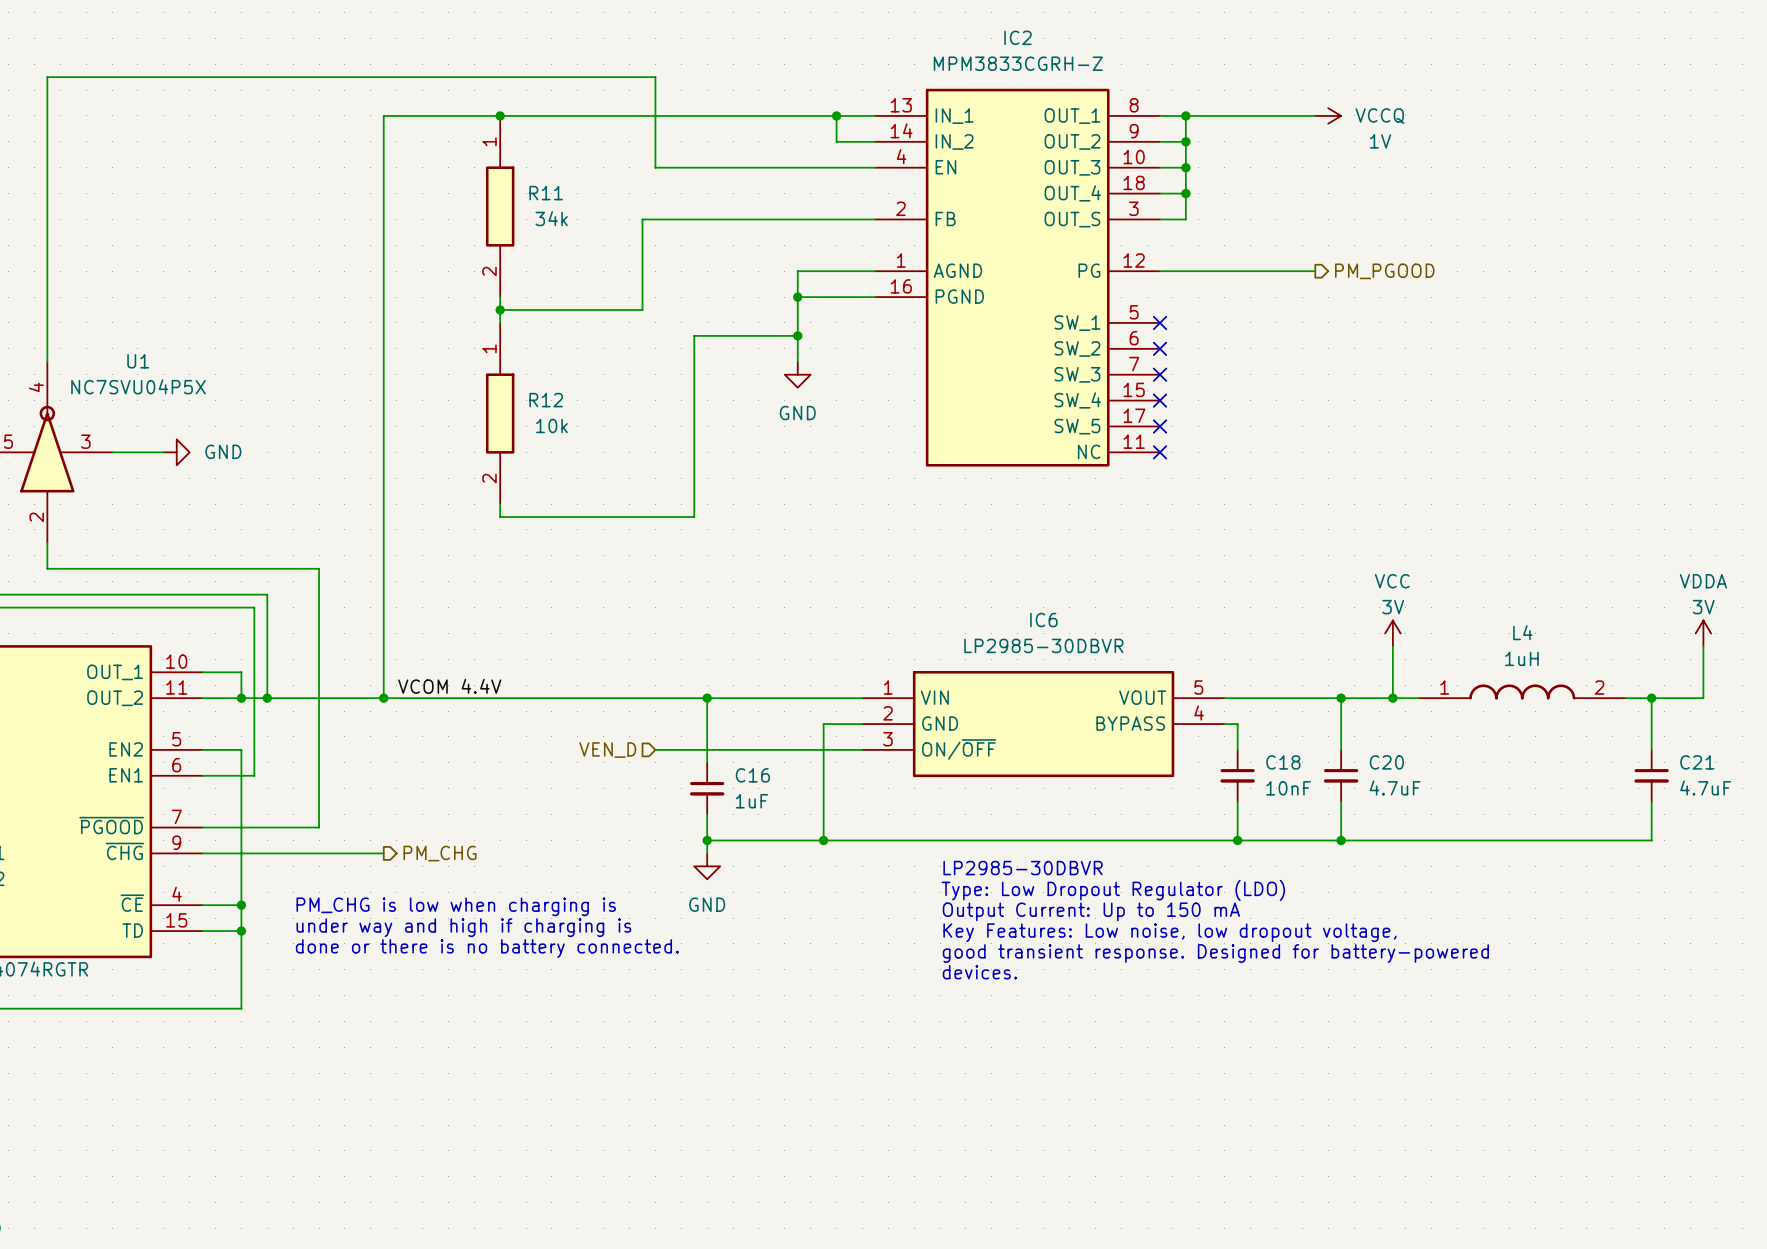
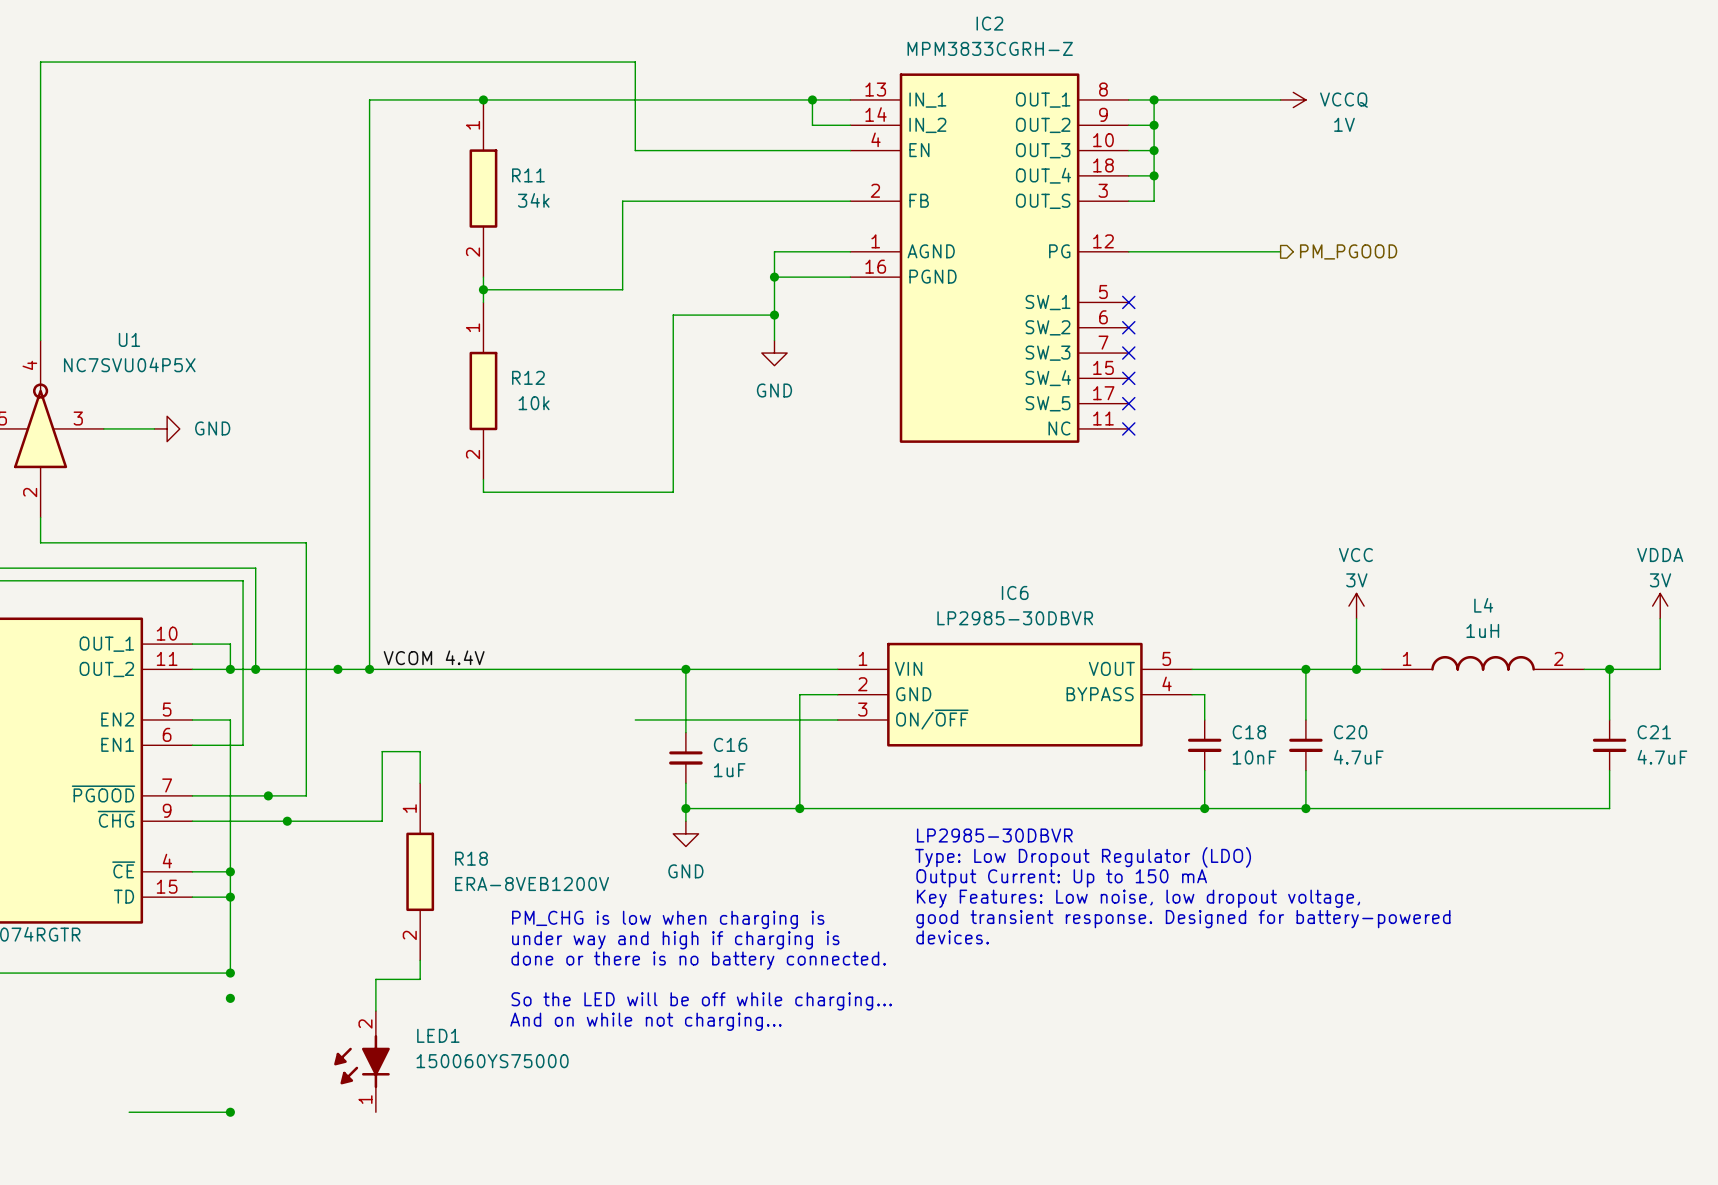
junction: none -> (337, 669)
hierarchical label: VEN_D (607, 750) -> none
wire: none -> (420, 783) (420, 751) (382, 751) (382, 821) (369, 821)
junction: none -> (268, 795)
junction: none -> (287, 821)
hierarchical label: PM_CHG (440, 853) -> none
R18: none -> ERA-8VEB1200V (420, 871)
text position: PM_CHG is low when charging is (456, 906) -> PM_CHG is low when charging is (668, 919)
text position: under way and high if charging is (463, 927) -> under way and high if charging is (675, 940)
text position: done or there is no battery connected. (487, 948) -> done or there is no battery connected. (698, 960)
wire: none -> (420, 960) (420, 979) (375, 979) (375, 1011)
junction: none -> (230, 973)
junction: none -> (230, 998)
text: none -> So the LED will be off while charging... (701, 1001)
text: none -> And on while not charging... (645, 1021)
LED1: none -> 150060YS75000 (361, 1061)
wire: none -> (129, 1112) (230, 1112)
junction: none -> (230, 1112)

